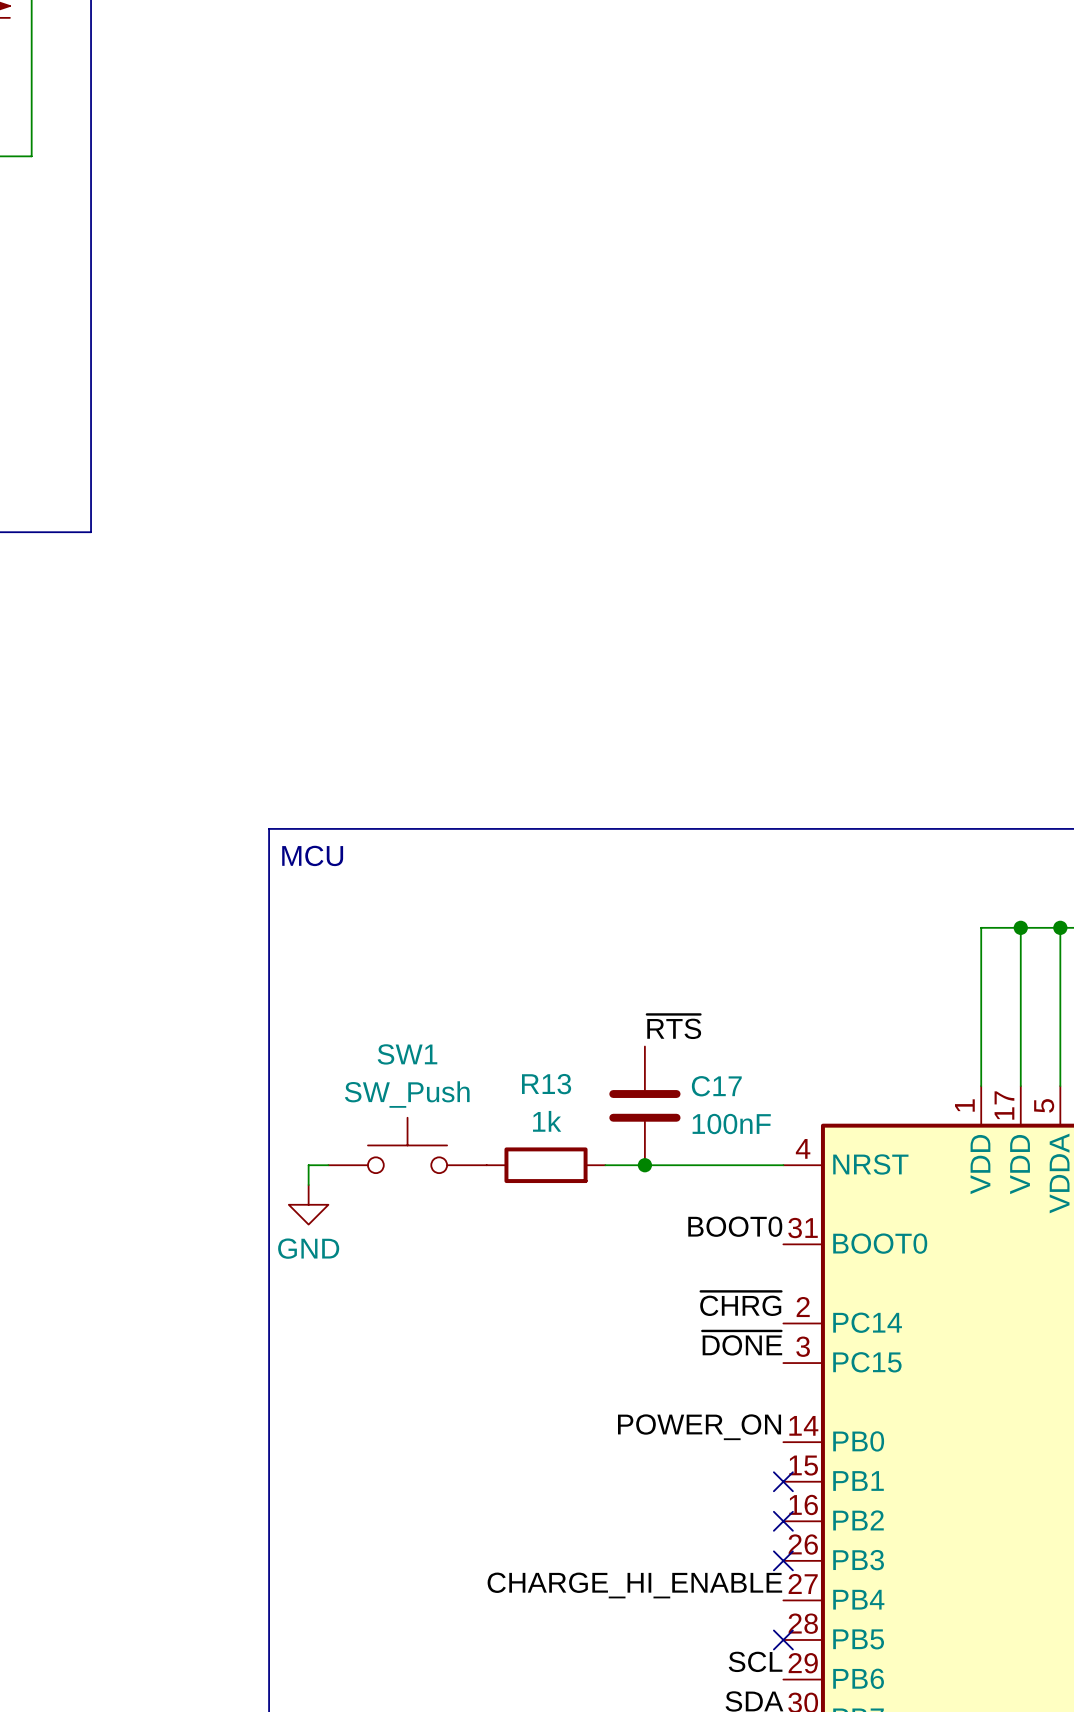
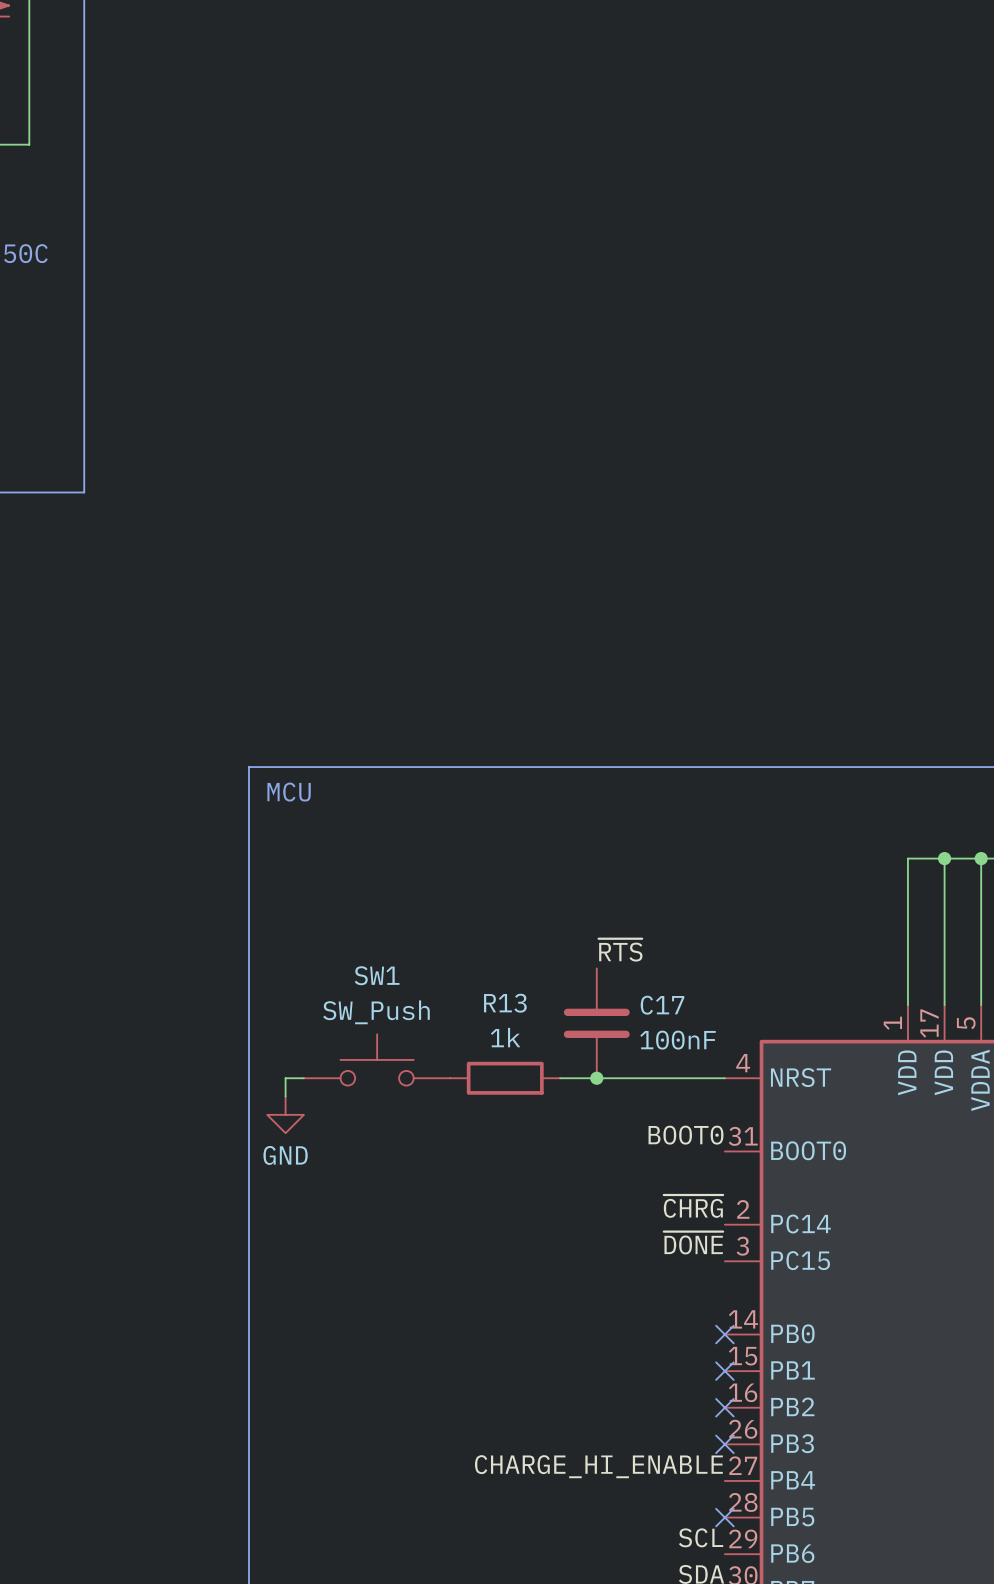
label: POWER_ON (699, 1427) -> none
no-connect mark: none -> (724, 1334)

